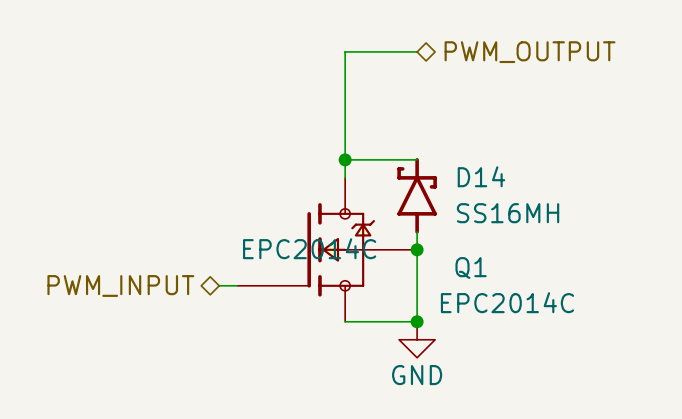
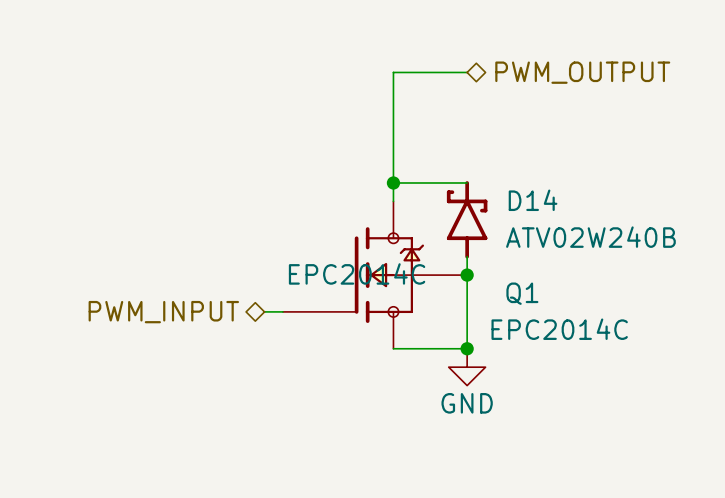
D14 value: SS16MH (508, 213) -> ATV02W240B (590, 237)

